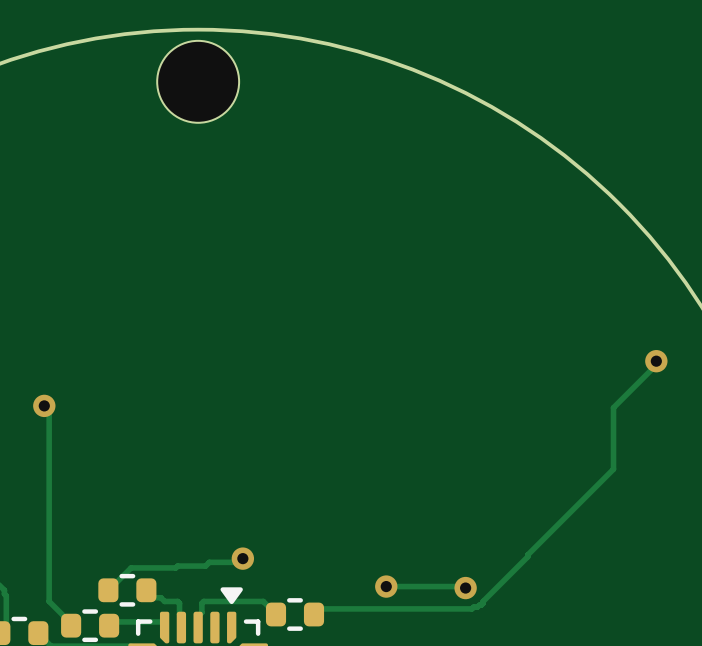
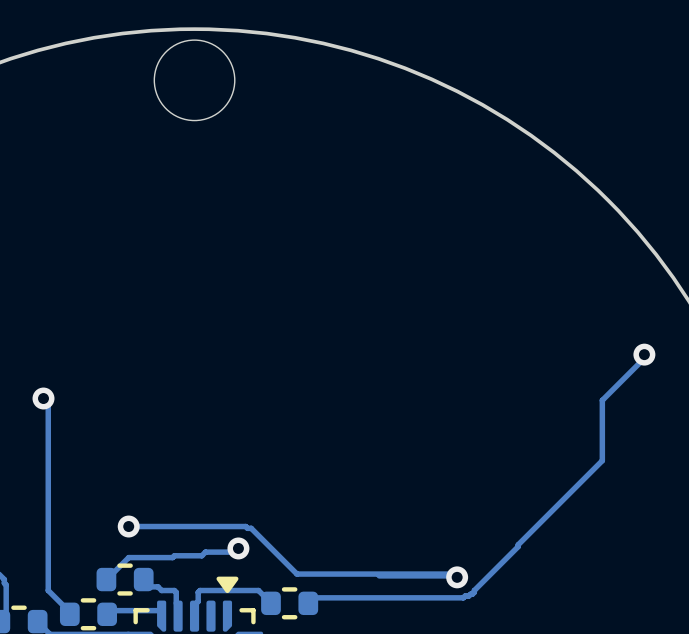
track: none -> (128, 526) (245, 526) (251, 528) (296, 574) (448, 574)
via: none -> (128, 526)
via: (386, 586) -> none

